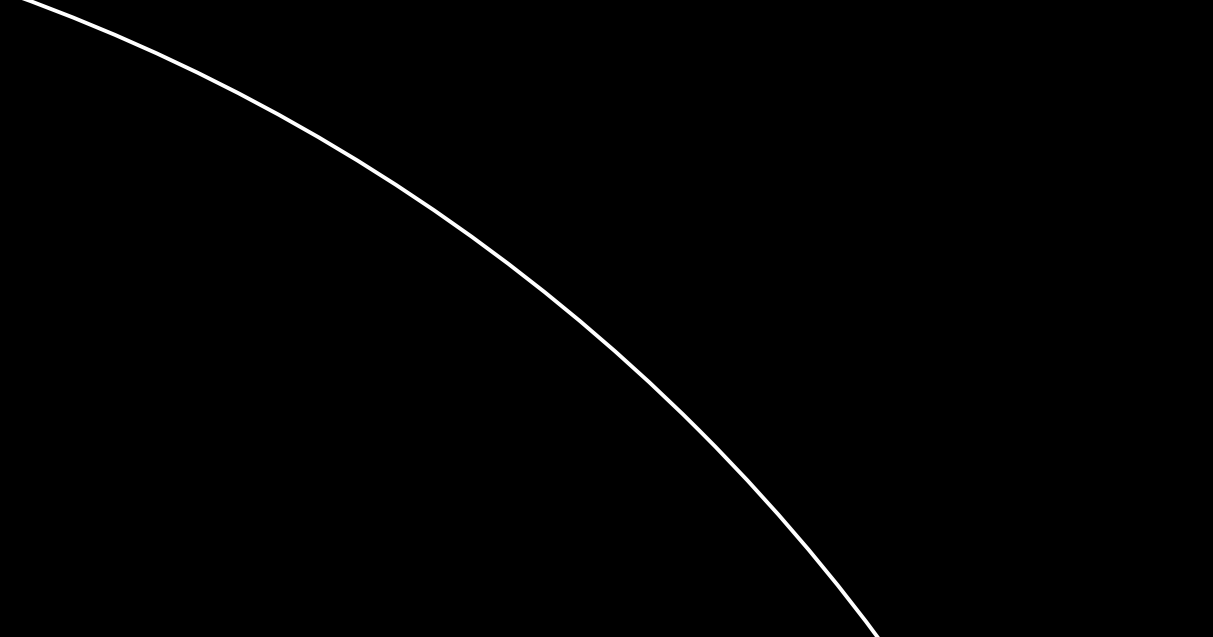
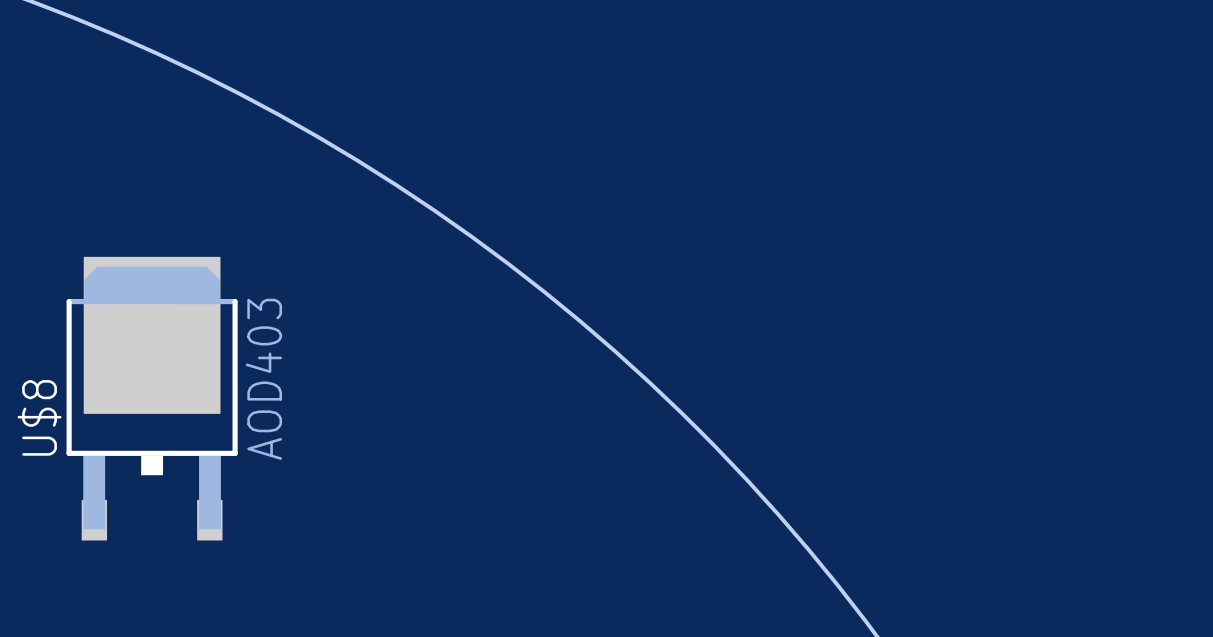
U$8: none -> AOD403 (152, 398)

